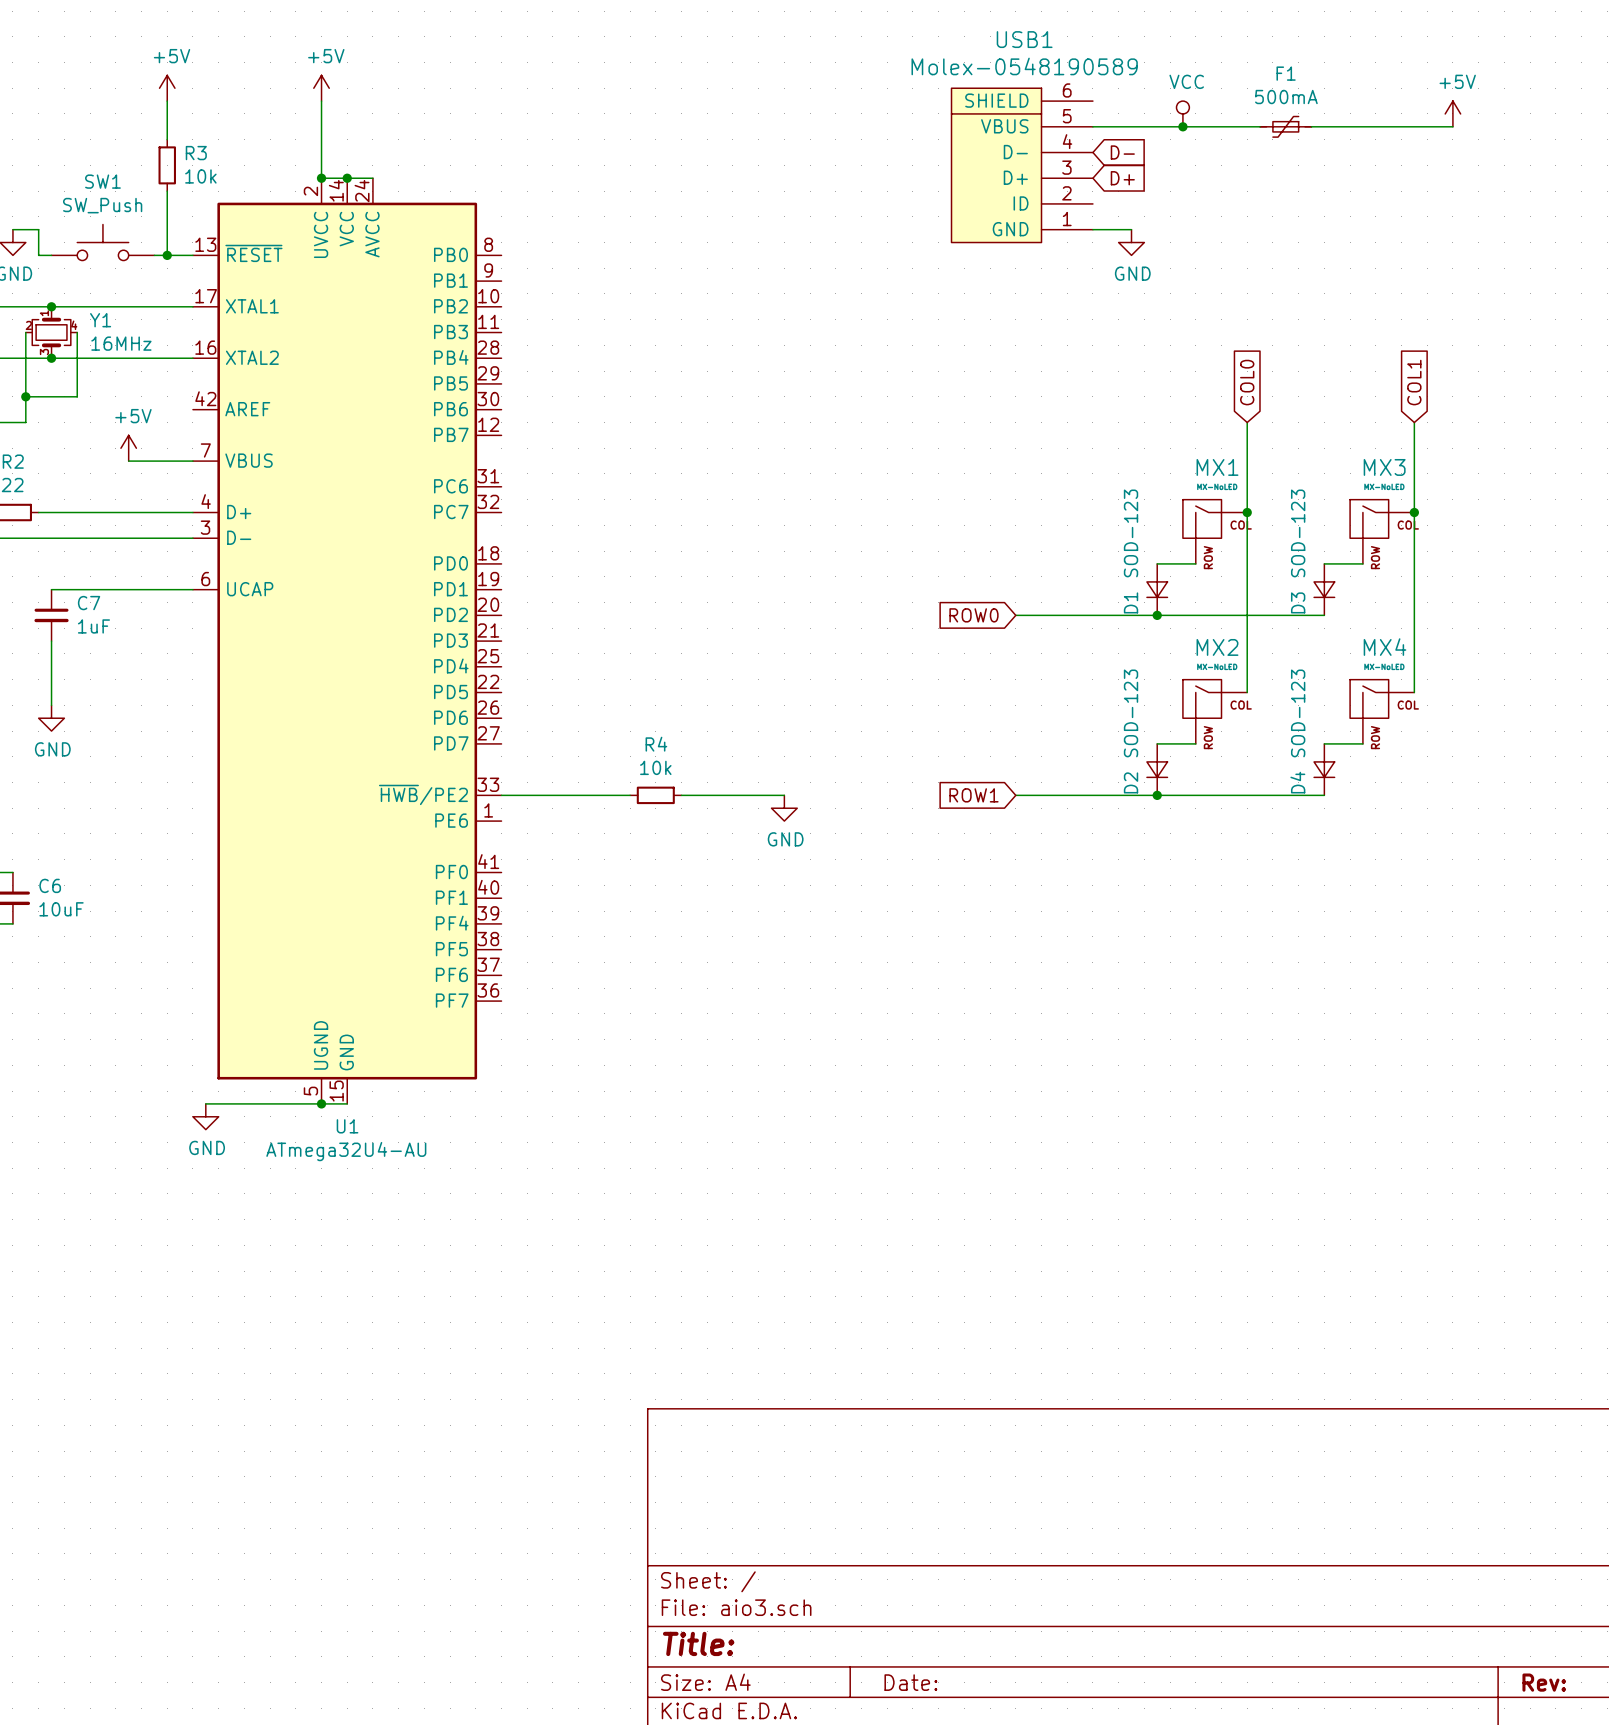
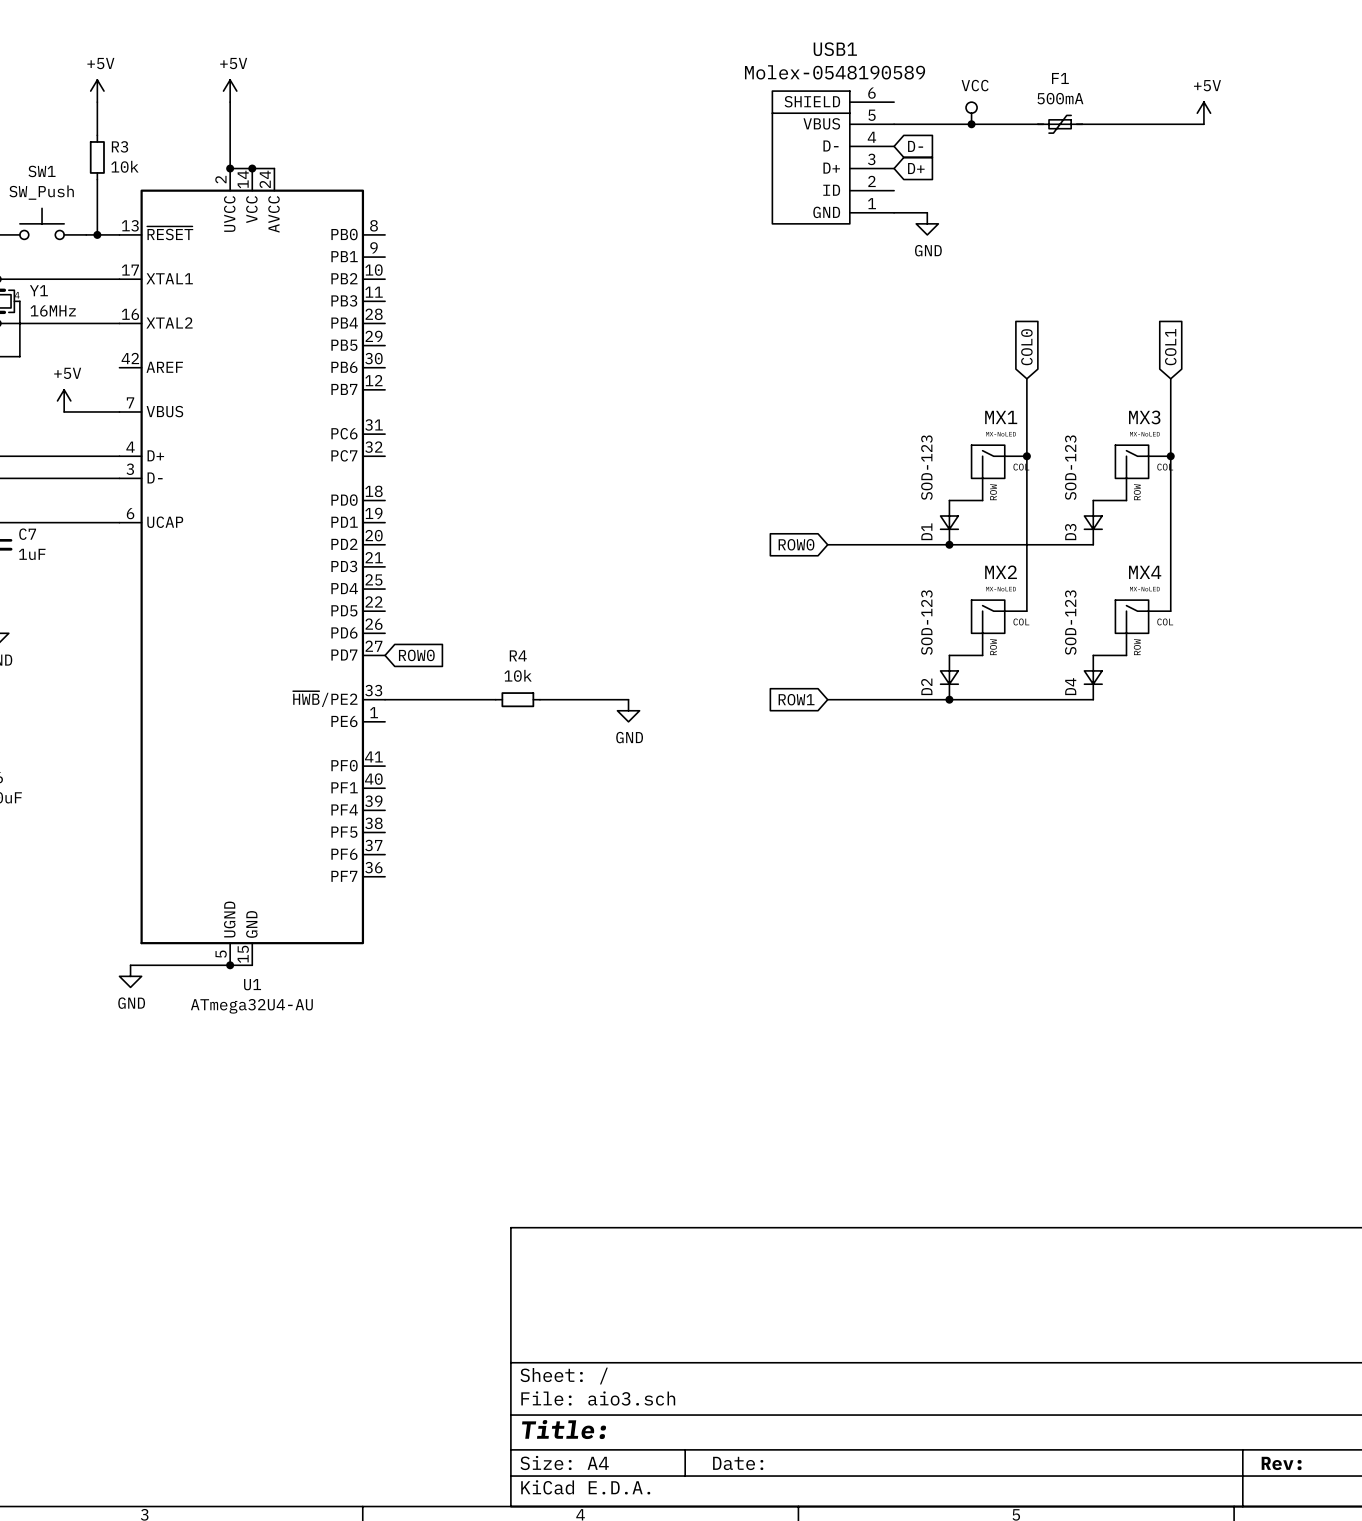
global label: none -> ROW0 (416, 655)

